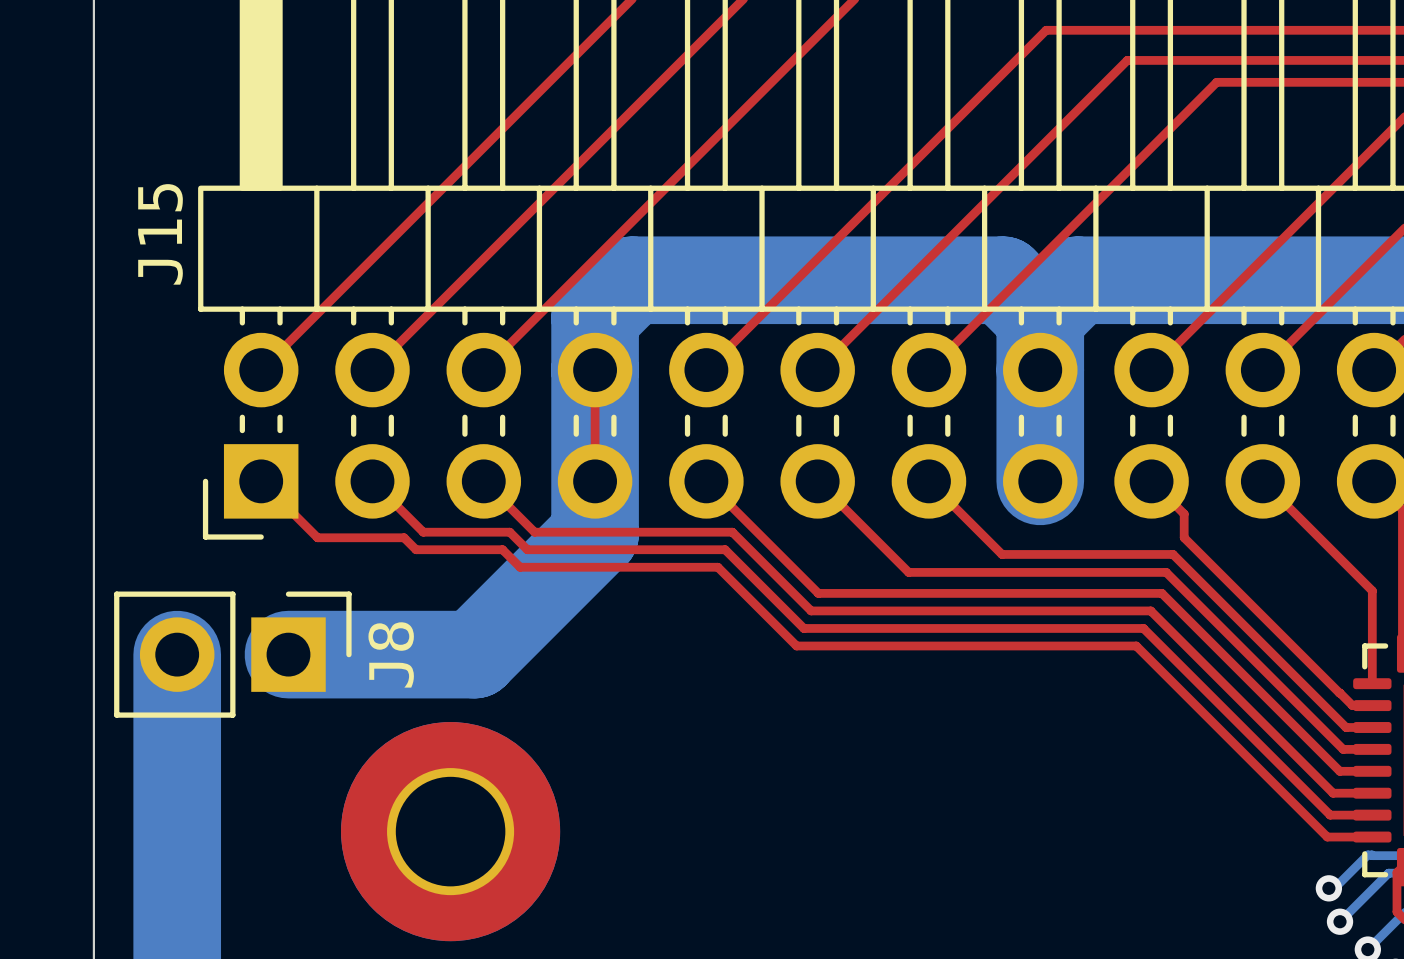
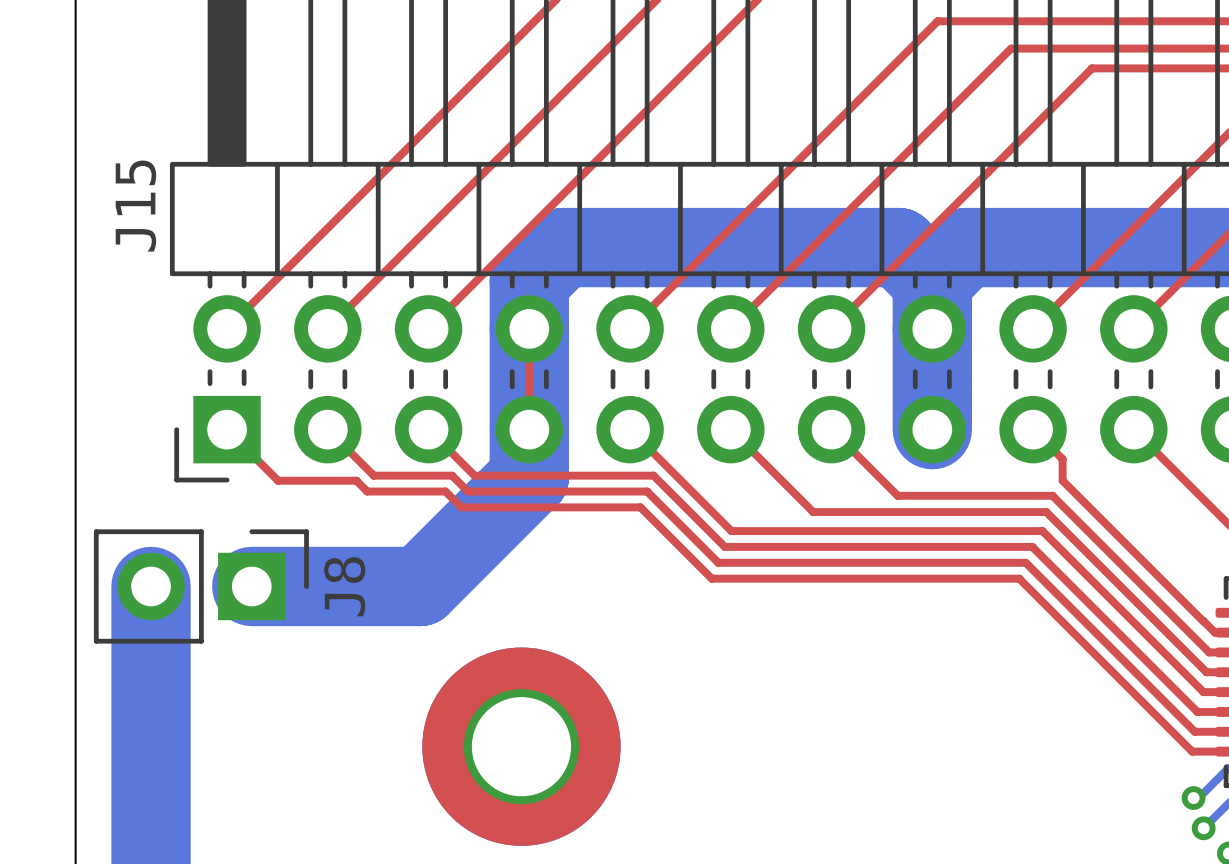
part position: (450, 831) -> (521, 746)

